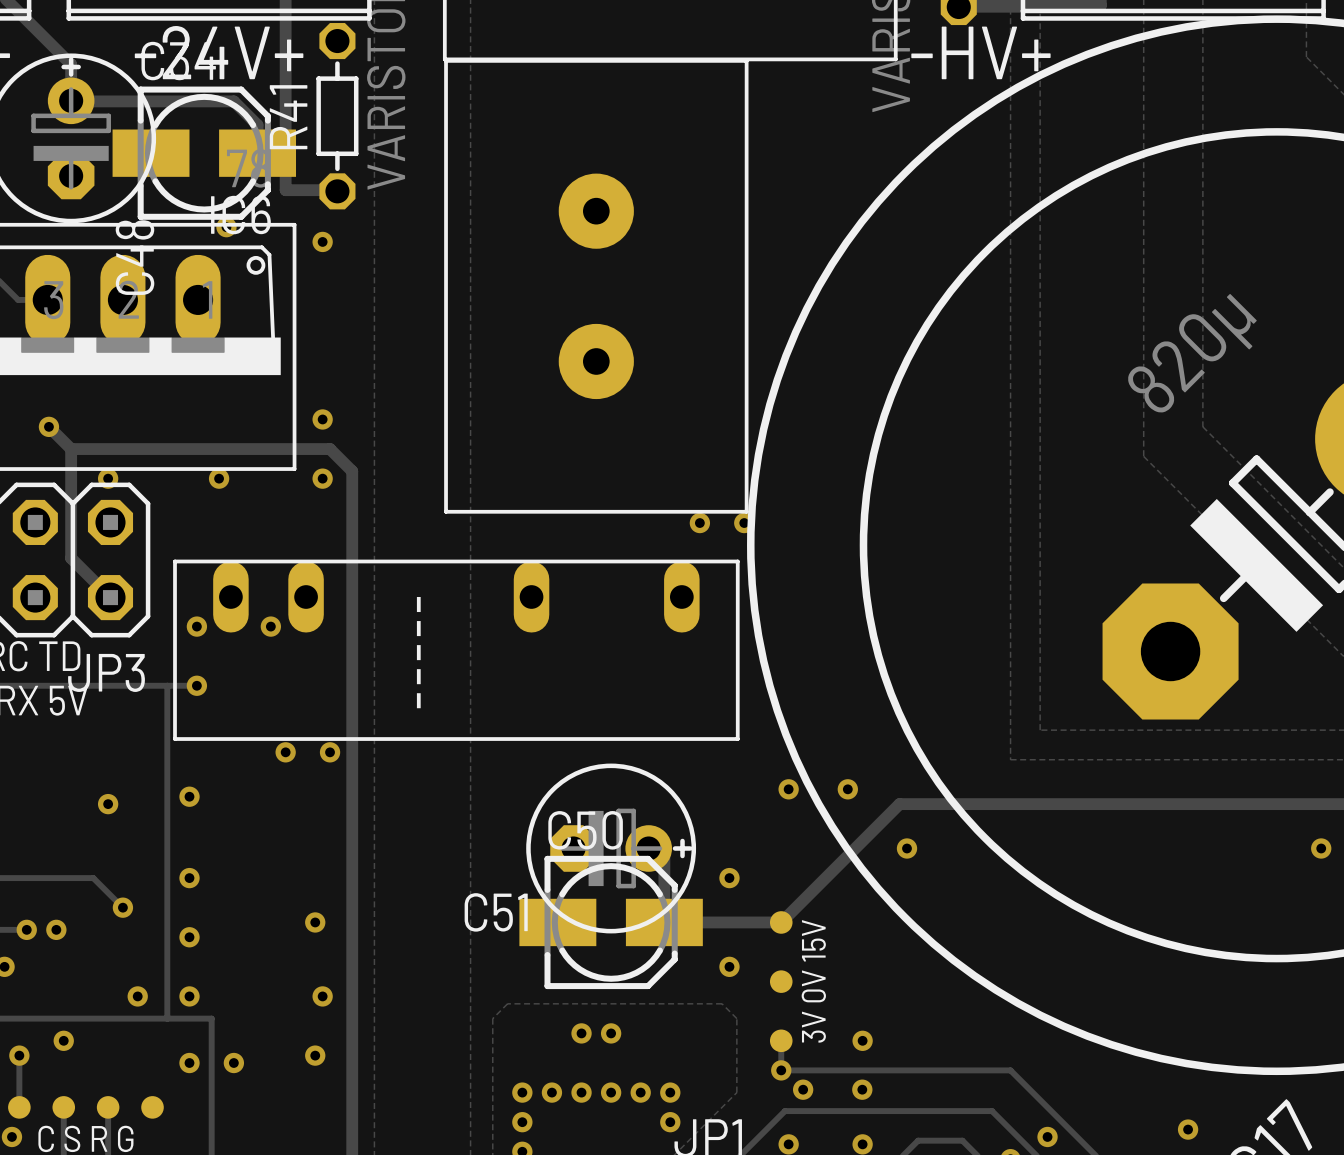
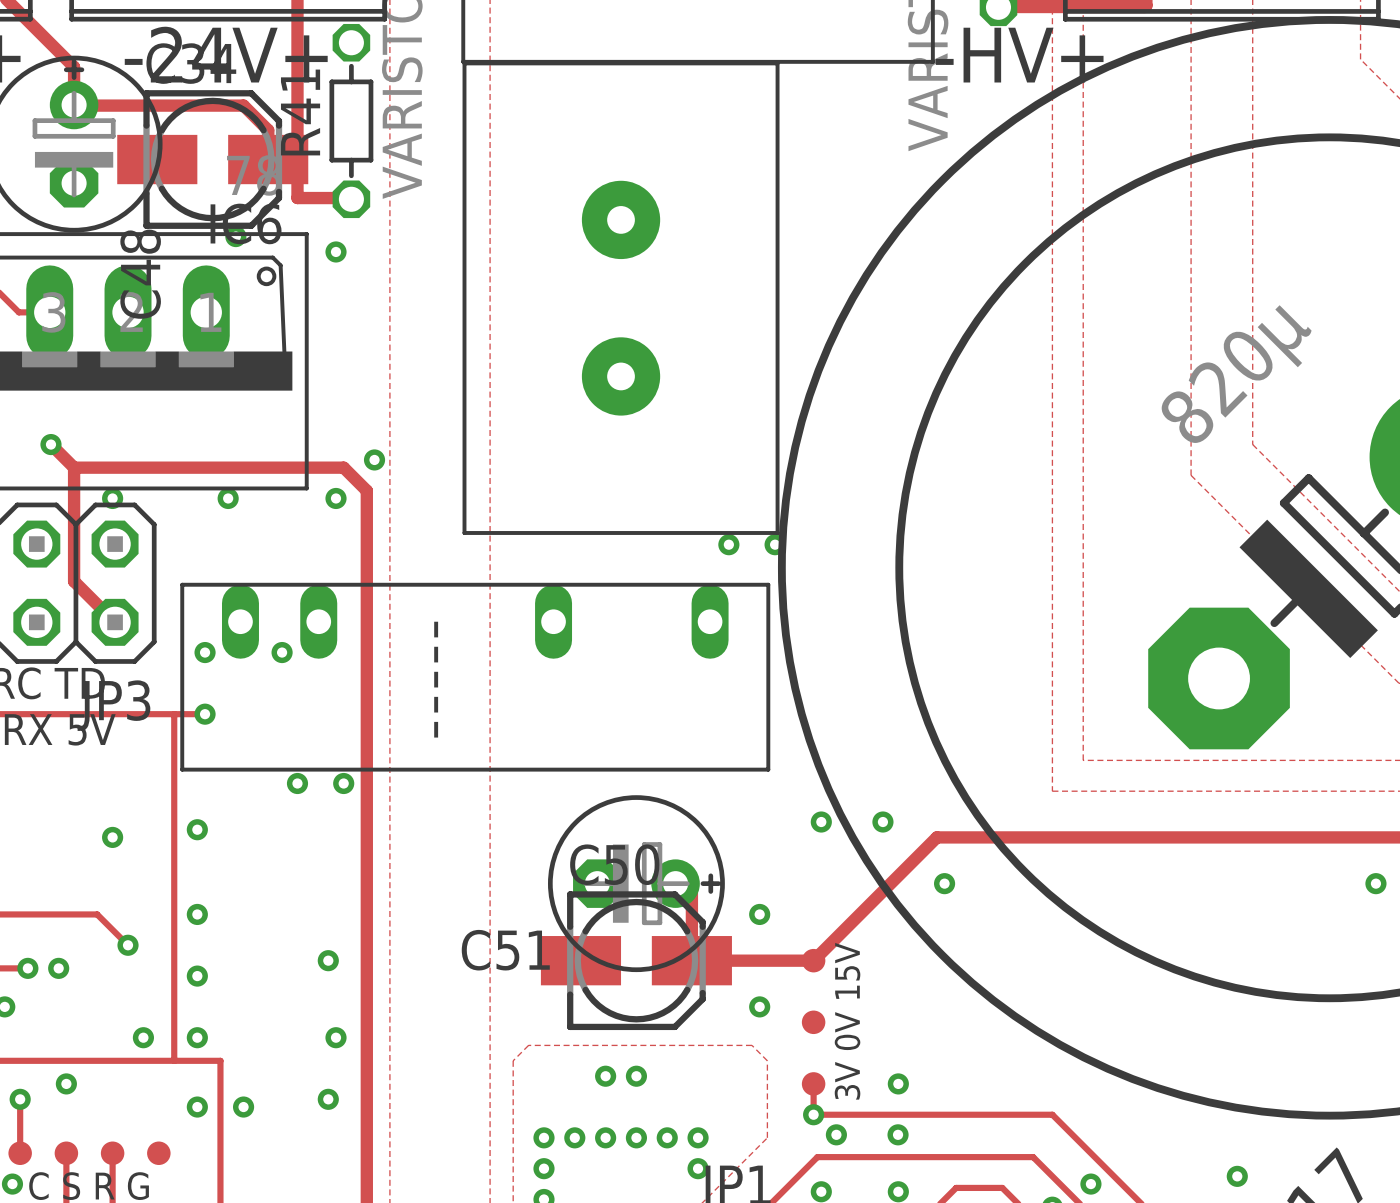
via position: (322, 419) -> (374, 459)

